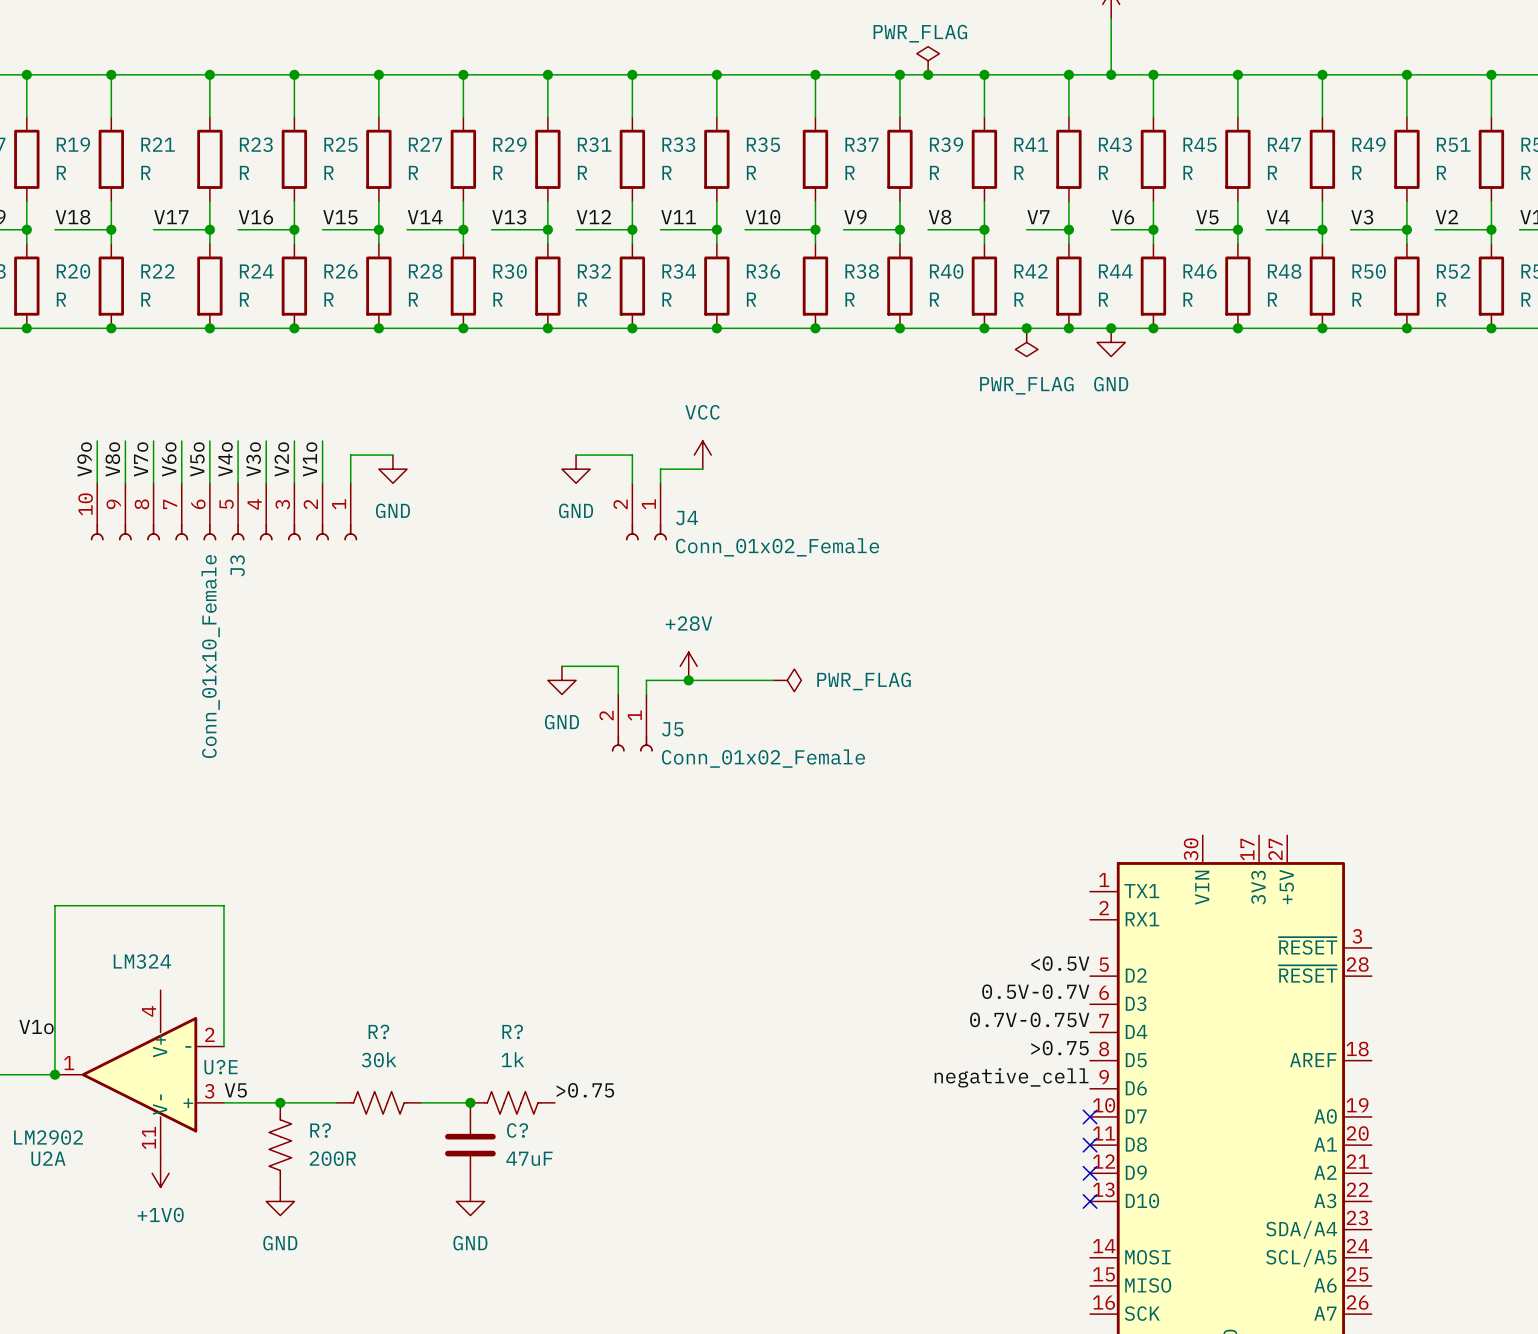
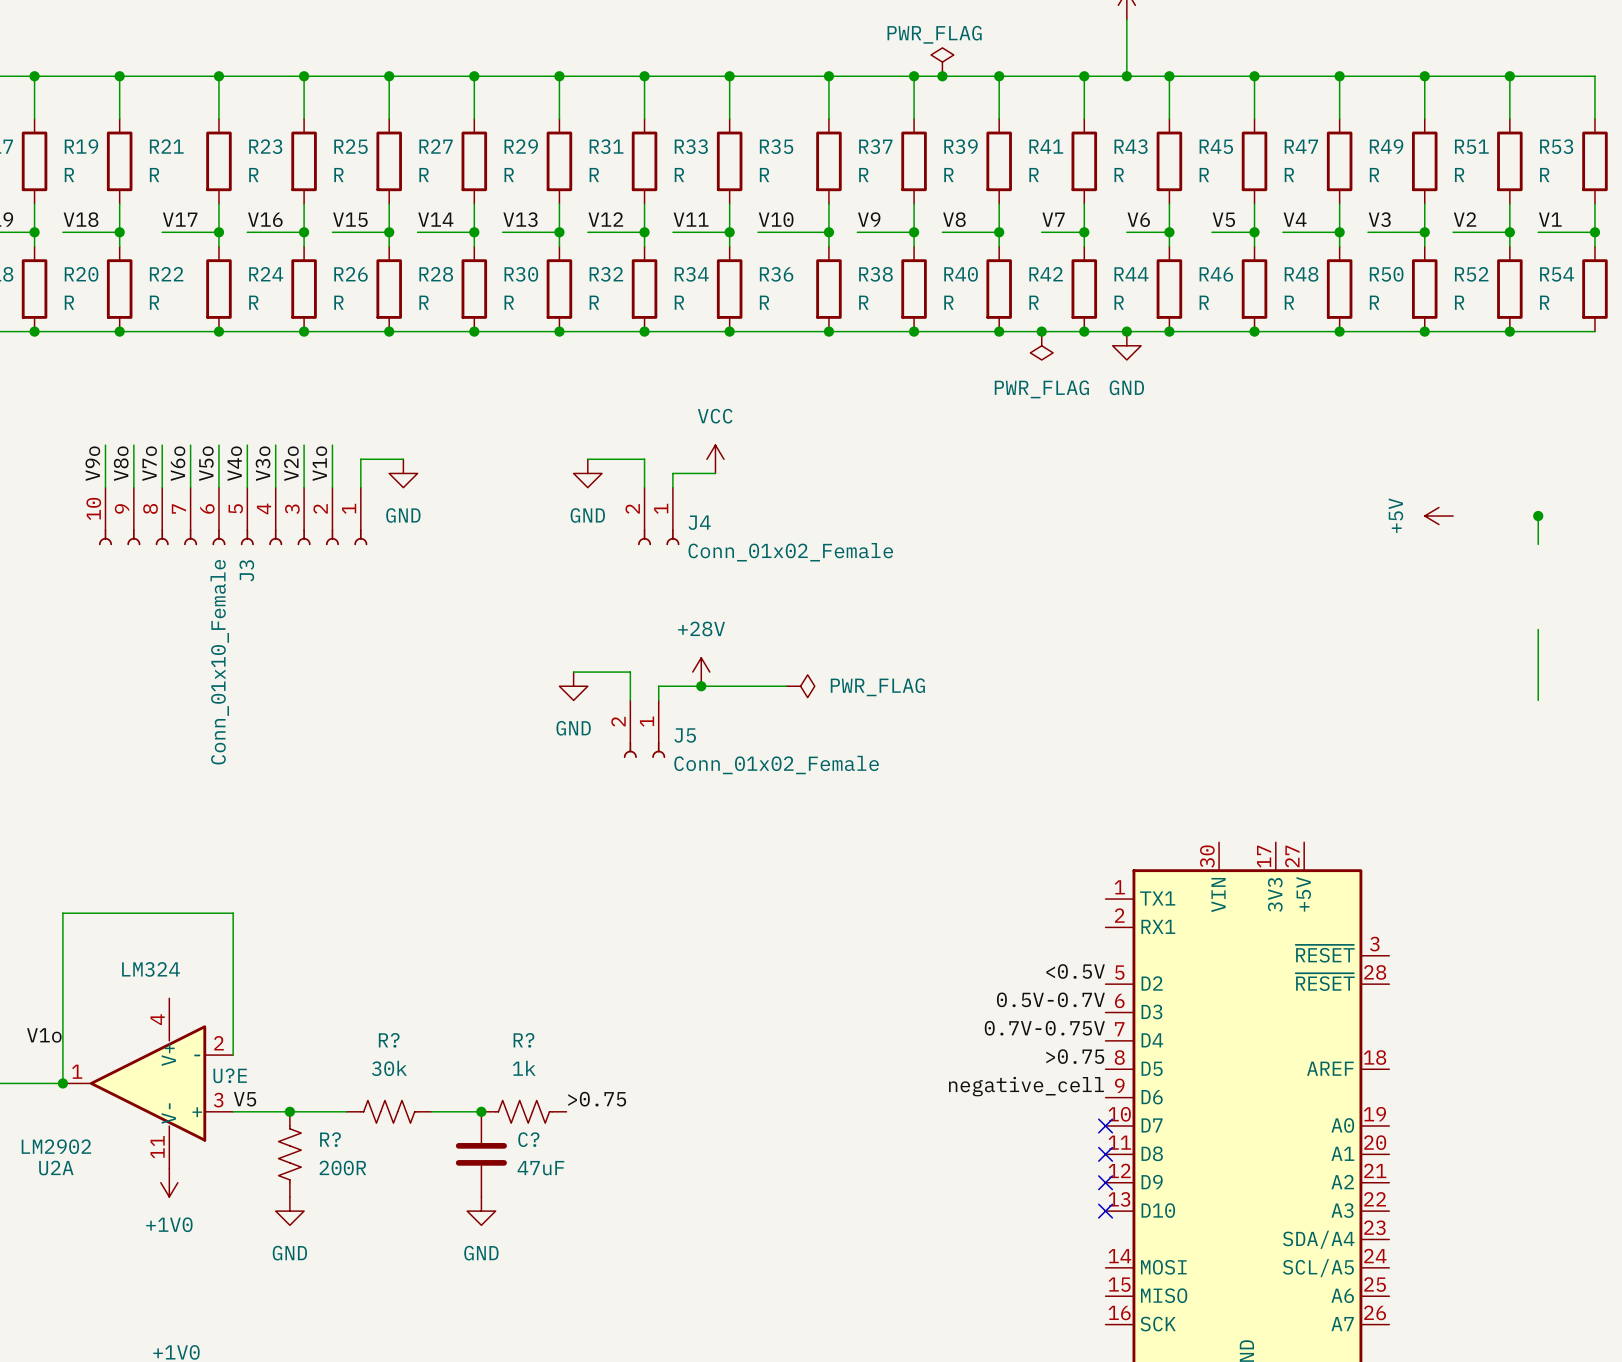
power symbol: none -> +5V (1438, 516)
wire: none -> (1538, 516) (1538, 544)
junction: none -> (1538, 516)
wire: none -> (1538, 629) (1538, 700)

